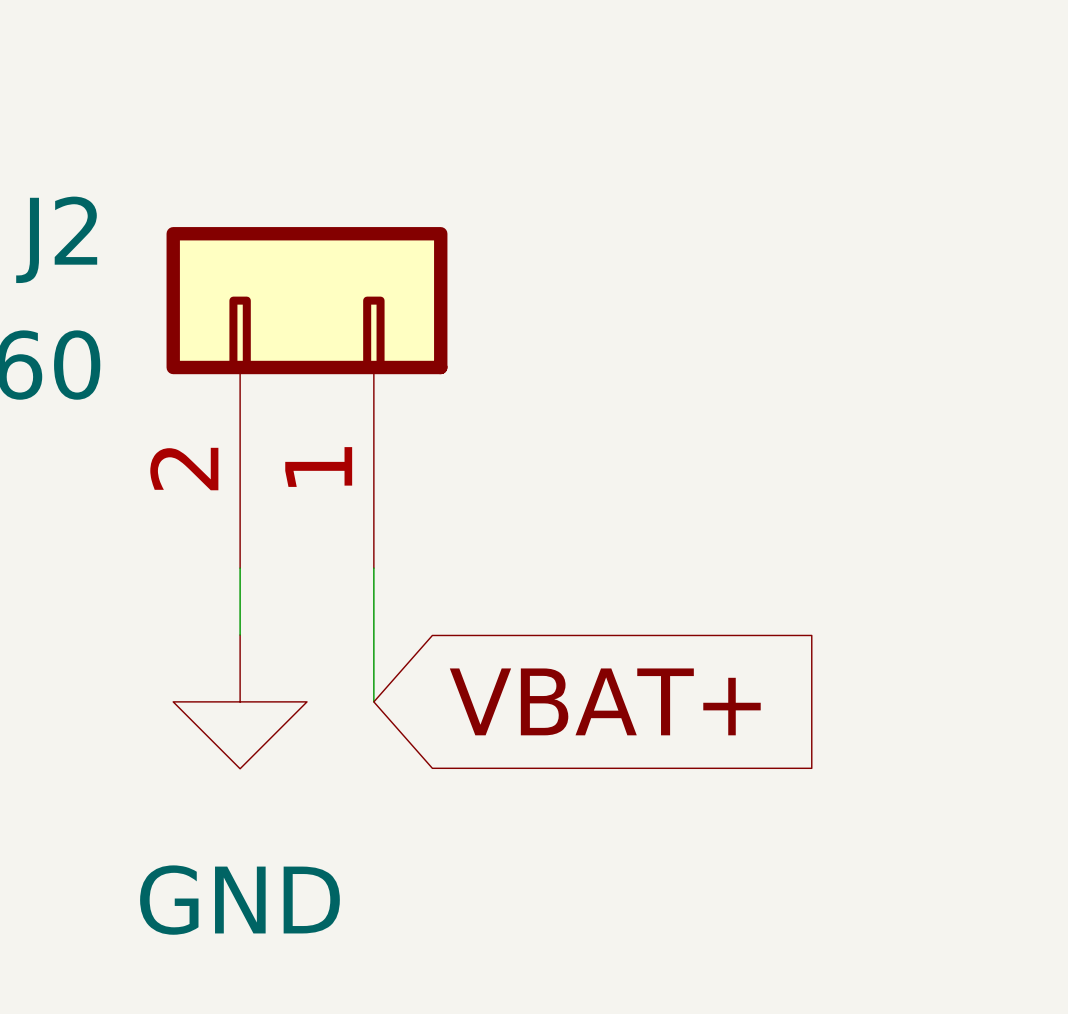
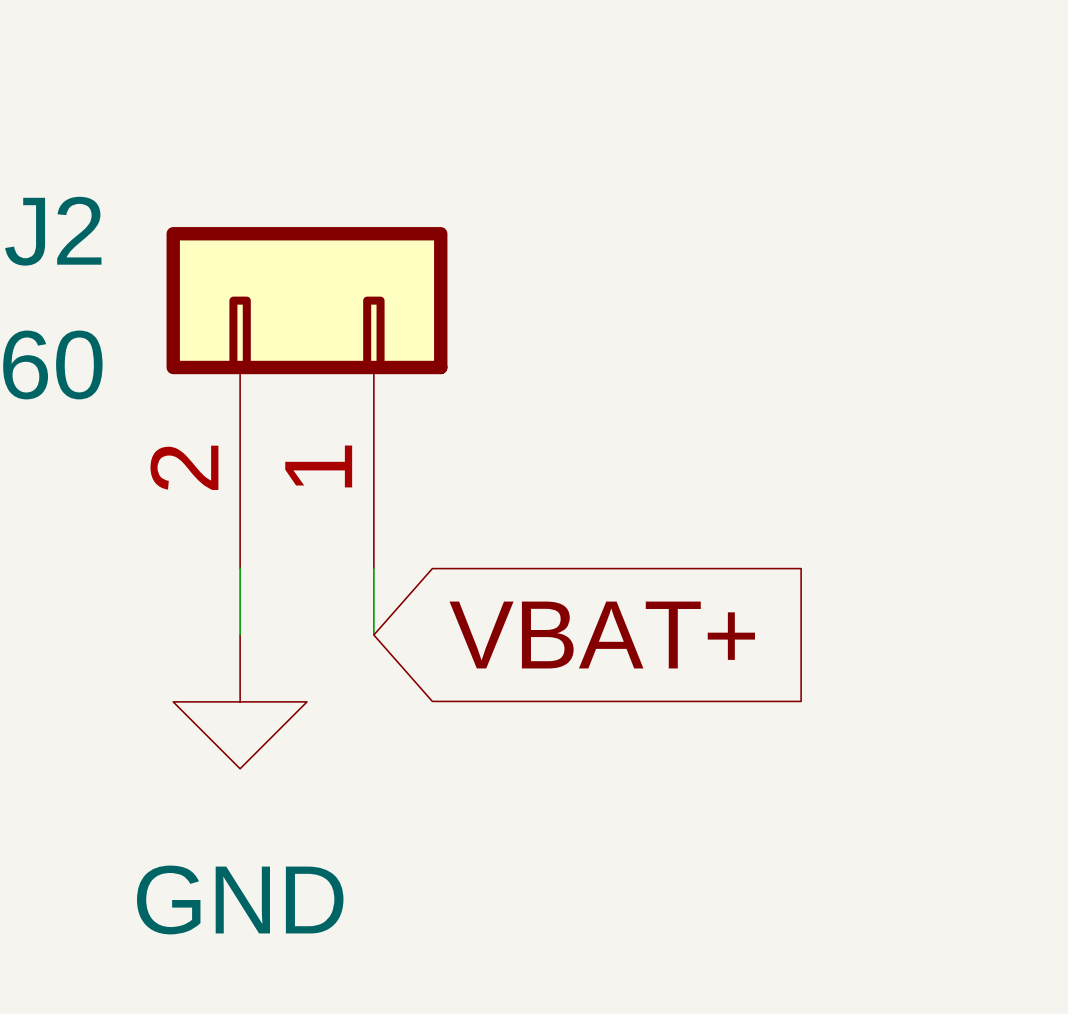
wire: (373, 635) (373, 701) -> none
global label position: VBAT+ (605, 701) -> VBAT+ (602, 635)

